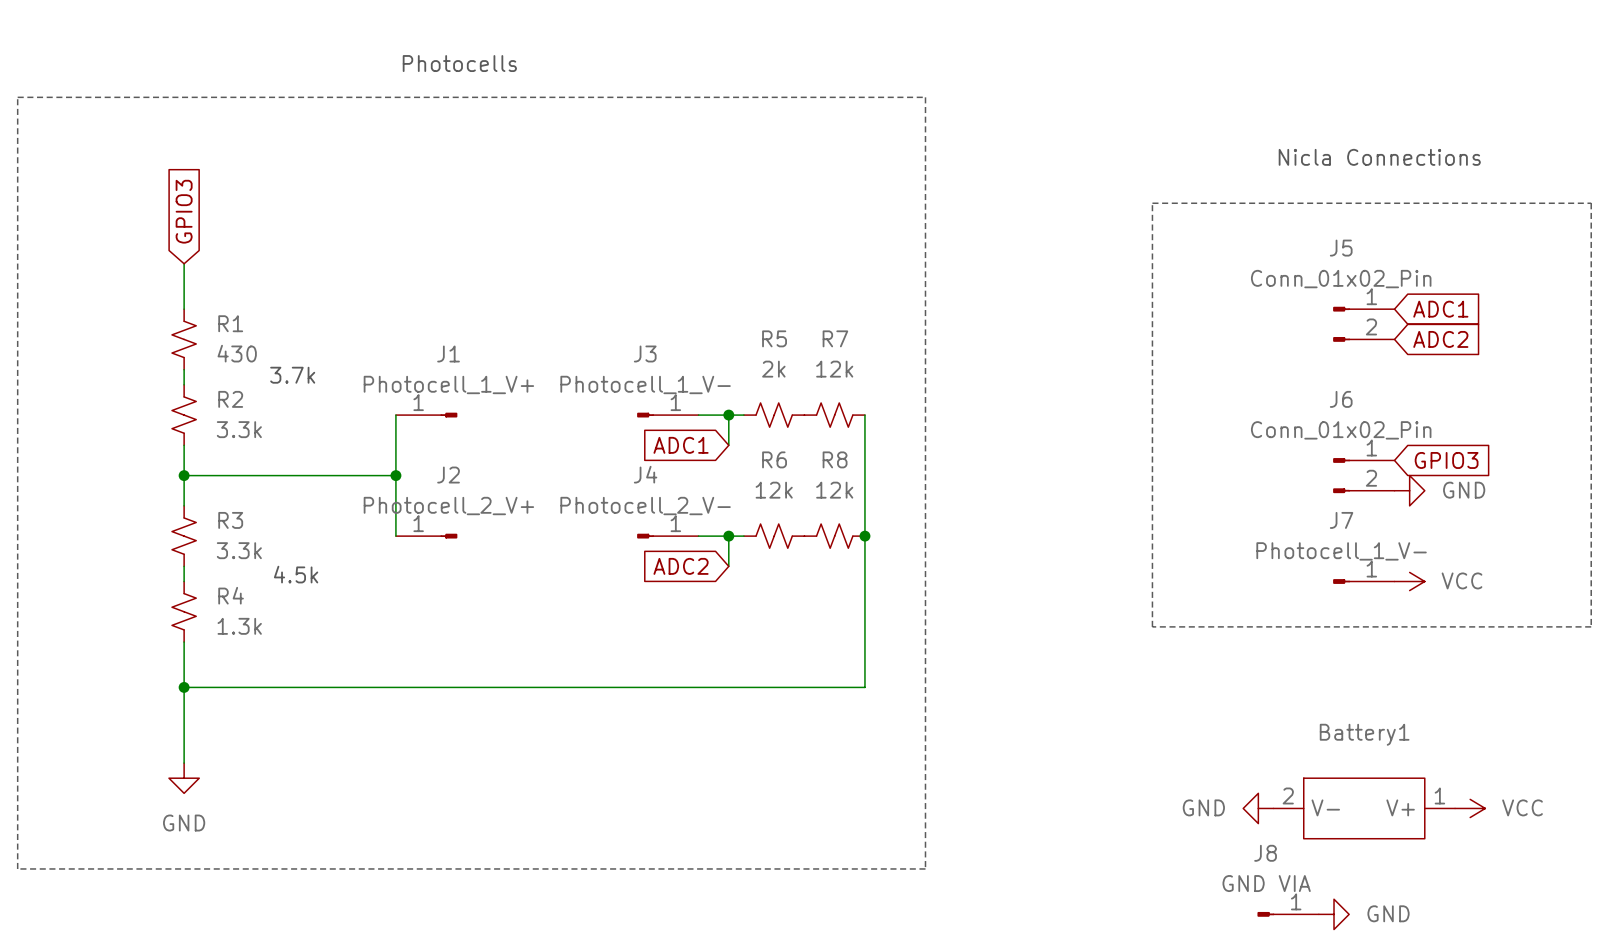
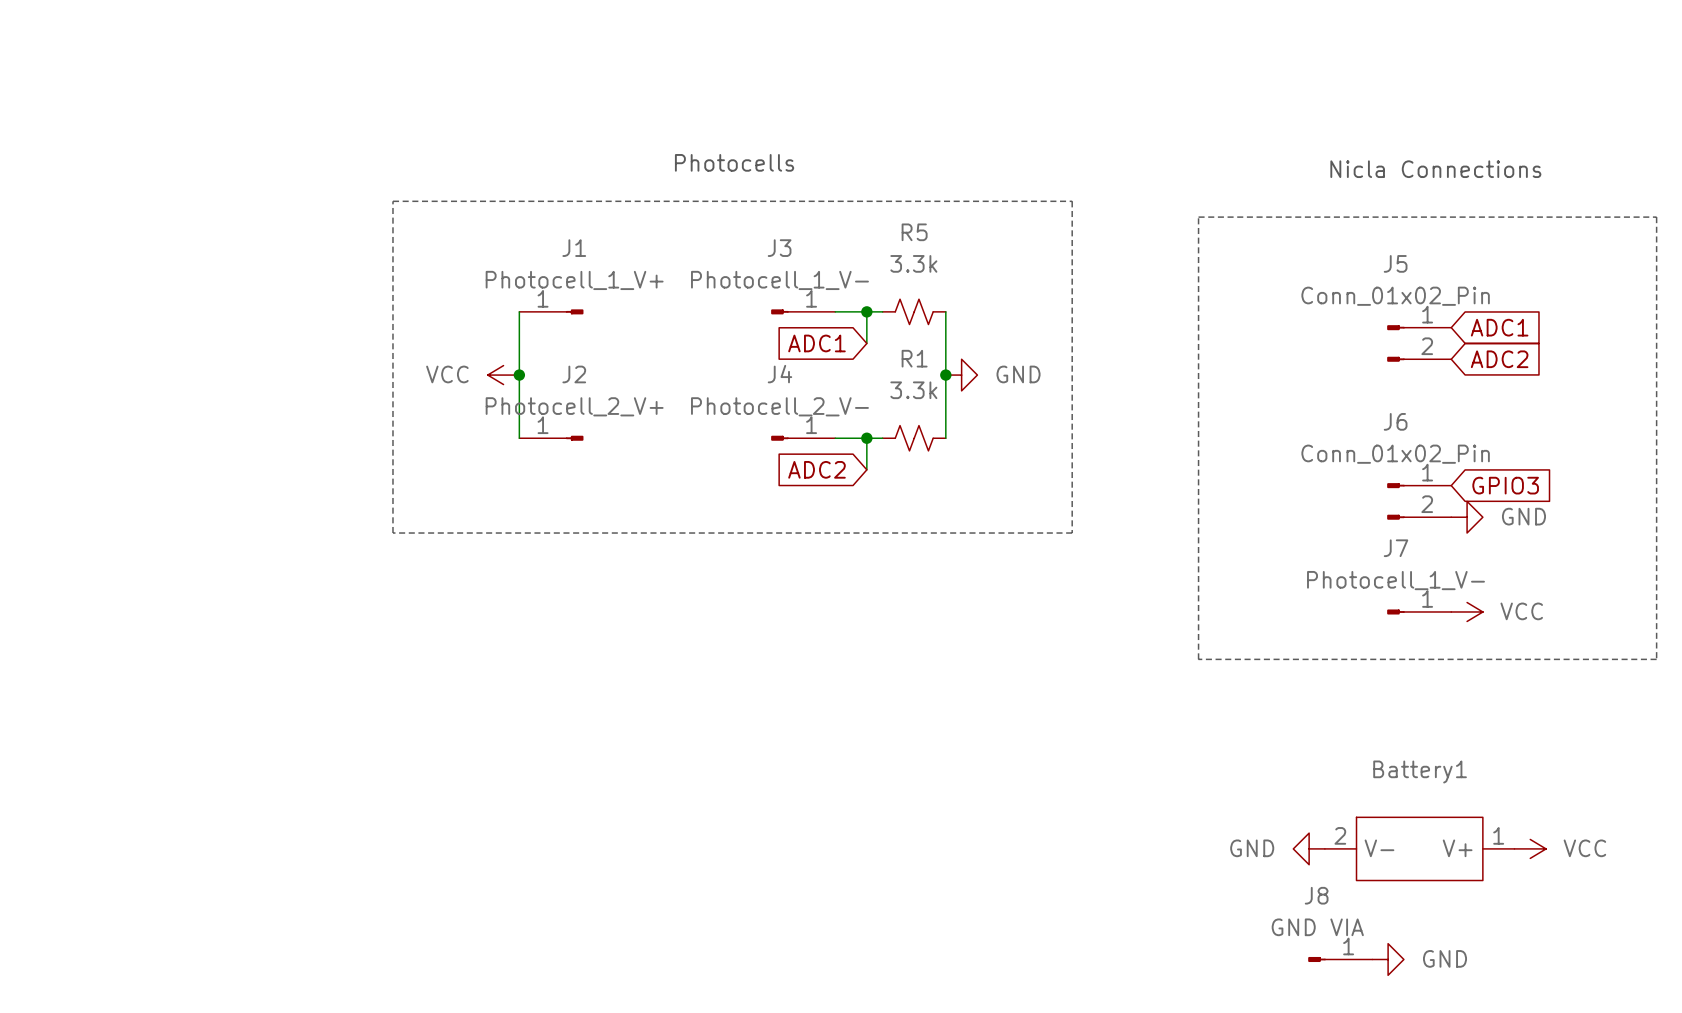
text position: Photocells (459, 63) -> Photocells (734, 162)
line: (17, 97) (925, 97) (925, 868) (17, 868) (17, 97) -> none
line: none -> (392, 201) (1072, 201) (1072, 533) (392, 533) (392, 201)
global label: GPIO3 (184, 211) -> none
wire: (184, 263) (184, 309) -> none
junction: none -> (866, 311)
wire: none -> (945, 311) (945, 438)
R1 name position: R1 (230, 323) -> R1 (914, 358)
R1 rotation: 0° (184, 339) -> 90° clockwise (914, 438)
R1 position: (184, 339) -> (914, 438)
R1 value: 430 (237, 353) -> 3.3k (913, 390)
power symbol: none -> VCC (503, 375)
junction: none -> (519, 375)
junction: none -> (945, 375)
power symbol: none -> GND (961, 375)
wire: (184, 369) (184, 384) -> none
R5 value: 2k (773, 369) -> 3.3k (913, 263)
text: 3.7k (292, 375) -> none
R2: 3.3k (184, 415) -> none
wire: (395, 415) (395, 536) -> (519, 311) (519, 438)
J1 position: (426, 415) -> (551, 311)
J3 position: (667, 415) -> (803, 311)
wire: (698, 415) (743, 415) -> (835, 311) (882, 311)
wire: (728, 415) (728, 445) -> (866, 311) (866, 343)
junction: (728, 415) -> none
R5 position: (774, 415) -> (914, 311)
junction: none -> (866, 438)
R7: 12k (834, 415) -> none
wire: (864, 415) (864, 687) (184, 687) -> none
wire: (184, 445) (184, 505) -> none
global label position: ADC1 (681, 445) -> ADC1 (816, 343)
wire: (184, 475) (395, 475) -> none
junction: (184, 475) -> none
junction: (395, 475) -> none
R3: 3.3k (184, 536) -> none
J2 position: (426, 536) -> (551, 438)
J4 position: (667, 536) -> (803, 438)
wire: (698, 536) (743, 536) -> (835, 438) (882, 438)
wire: (728, 536) (728, 566) -> (866, 438) (866, 469)
junction: (728, 536) -> none
R6: 12k (774, 536) -> none
R8: 12k (834, 536) -> none
junction: (864, 536) -> none
wire: (184, 566) (184, 581) -> none
global label position: ADC2 (681, 566) -> ADC2 (816, 469)
text: 4.5k (296, 574) -> none
R4: 1.3k (184, 611) -> none
wire: (184, 642) (184, 763) -> none
junction: (184, 687) -> none
power symbol: GND (184, 778) -> none

